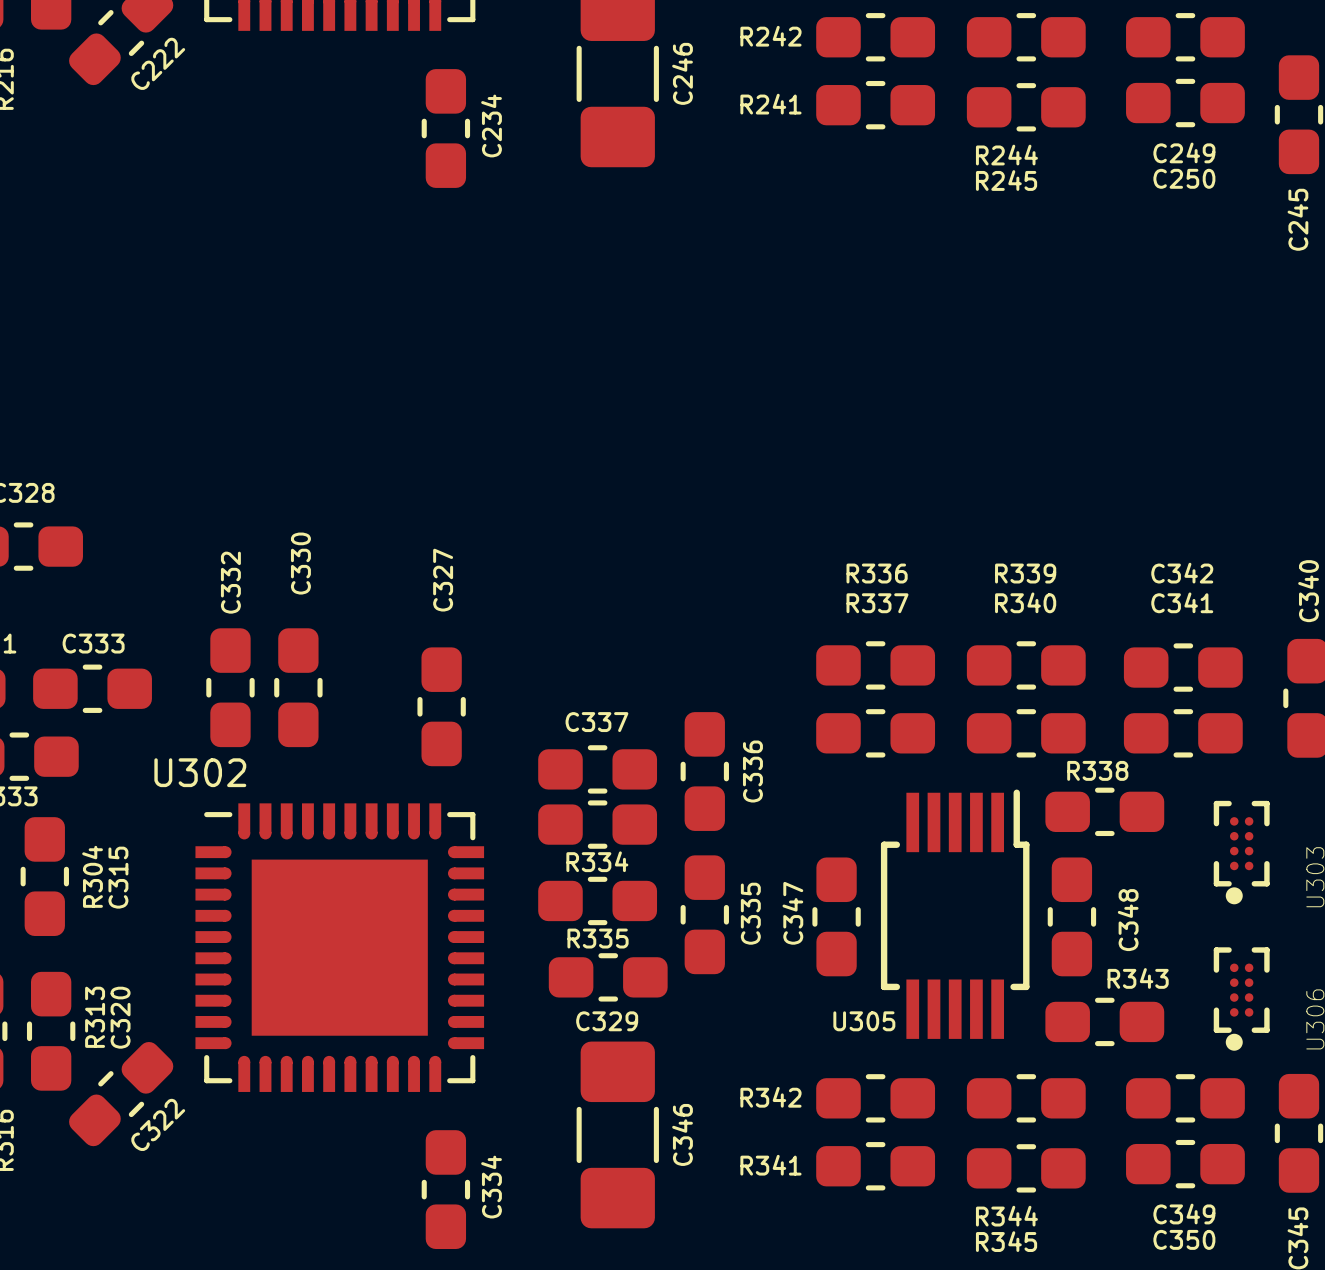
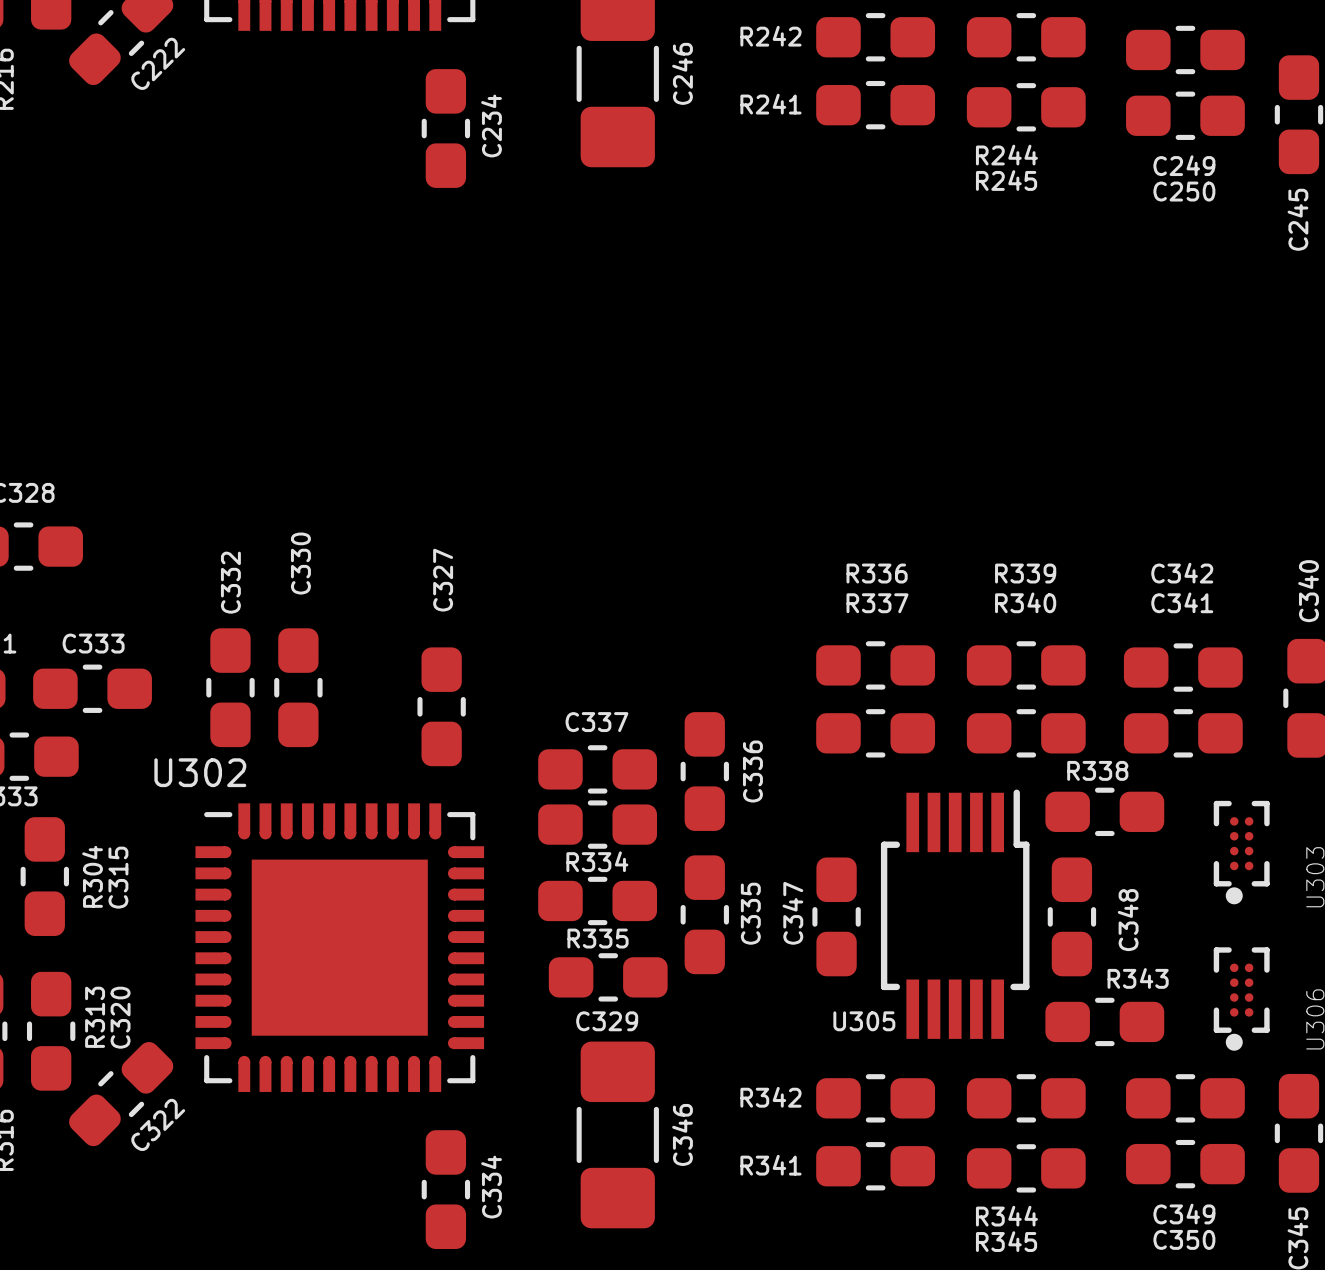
C249 position: (1185, 37) -> (1185, 49)
C250 position: (1185, 103) -> (1185, 115)

